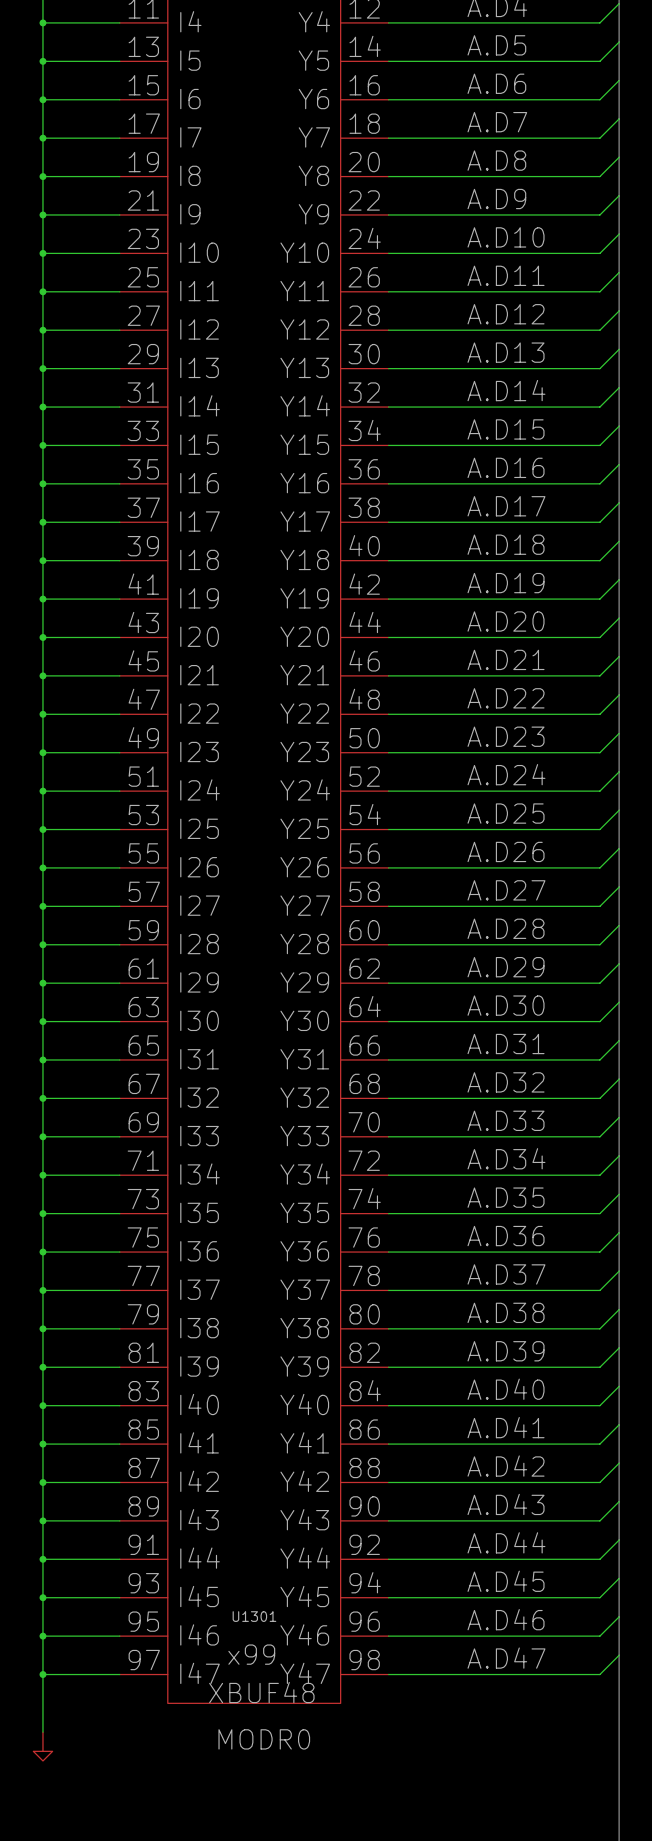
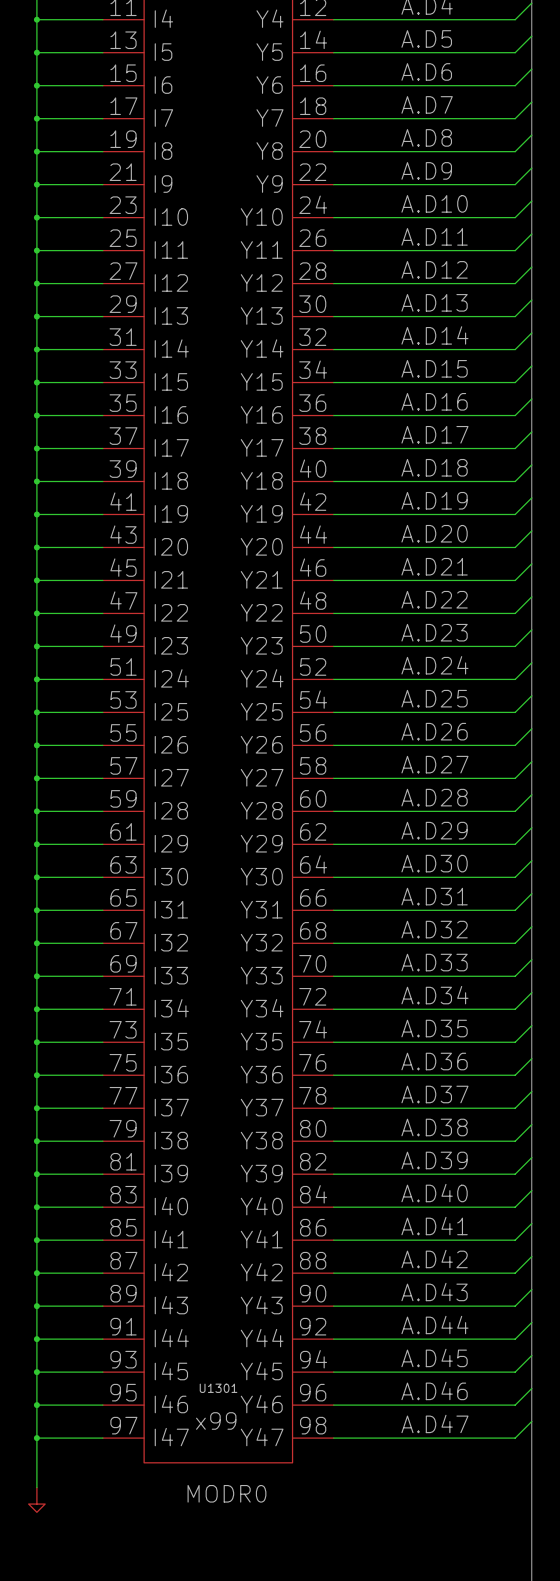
U1301 value: XBUF48 (261, 1692) -> none

